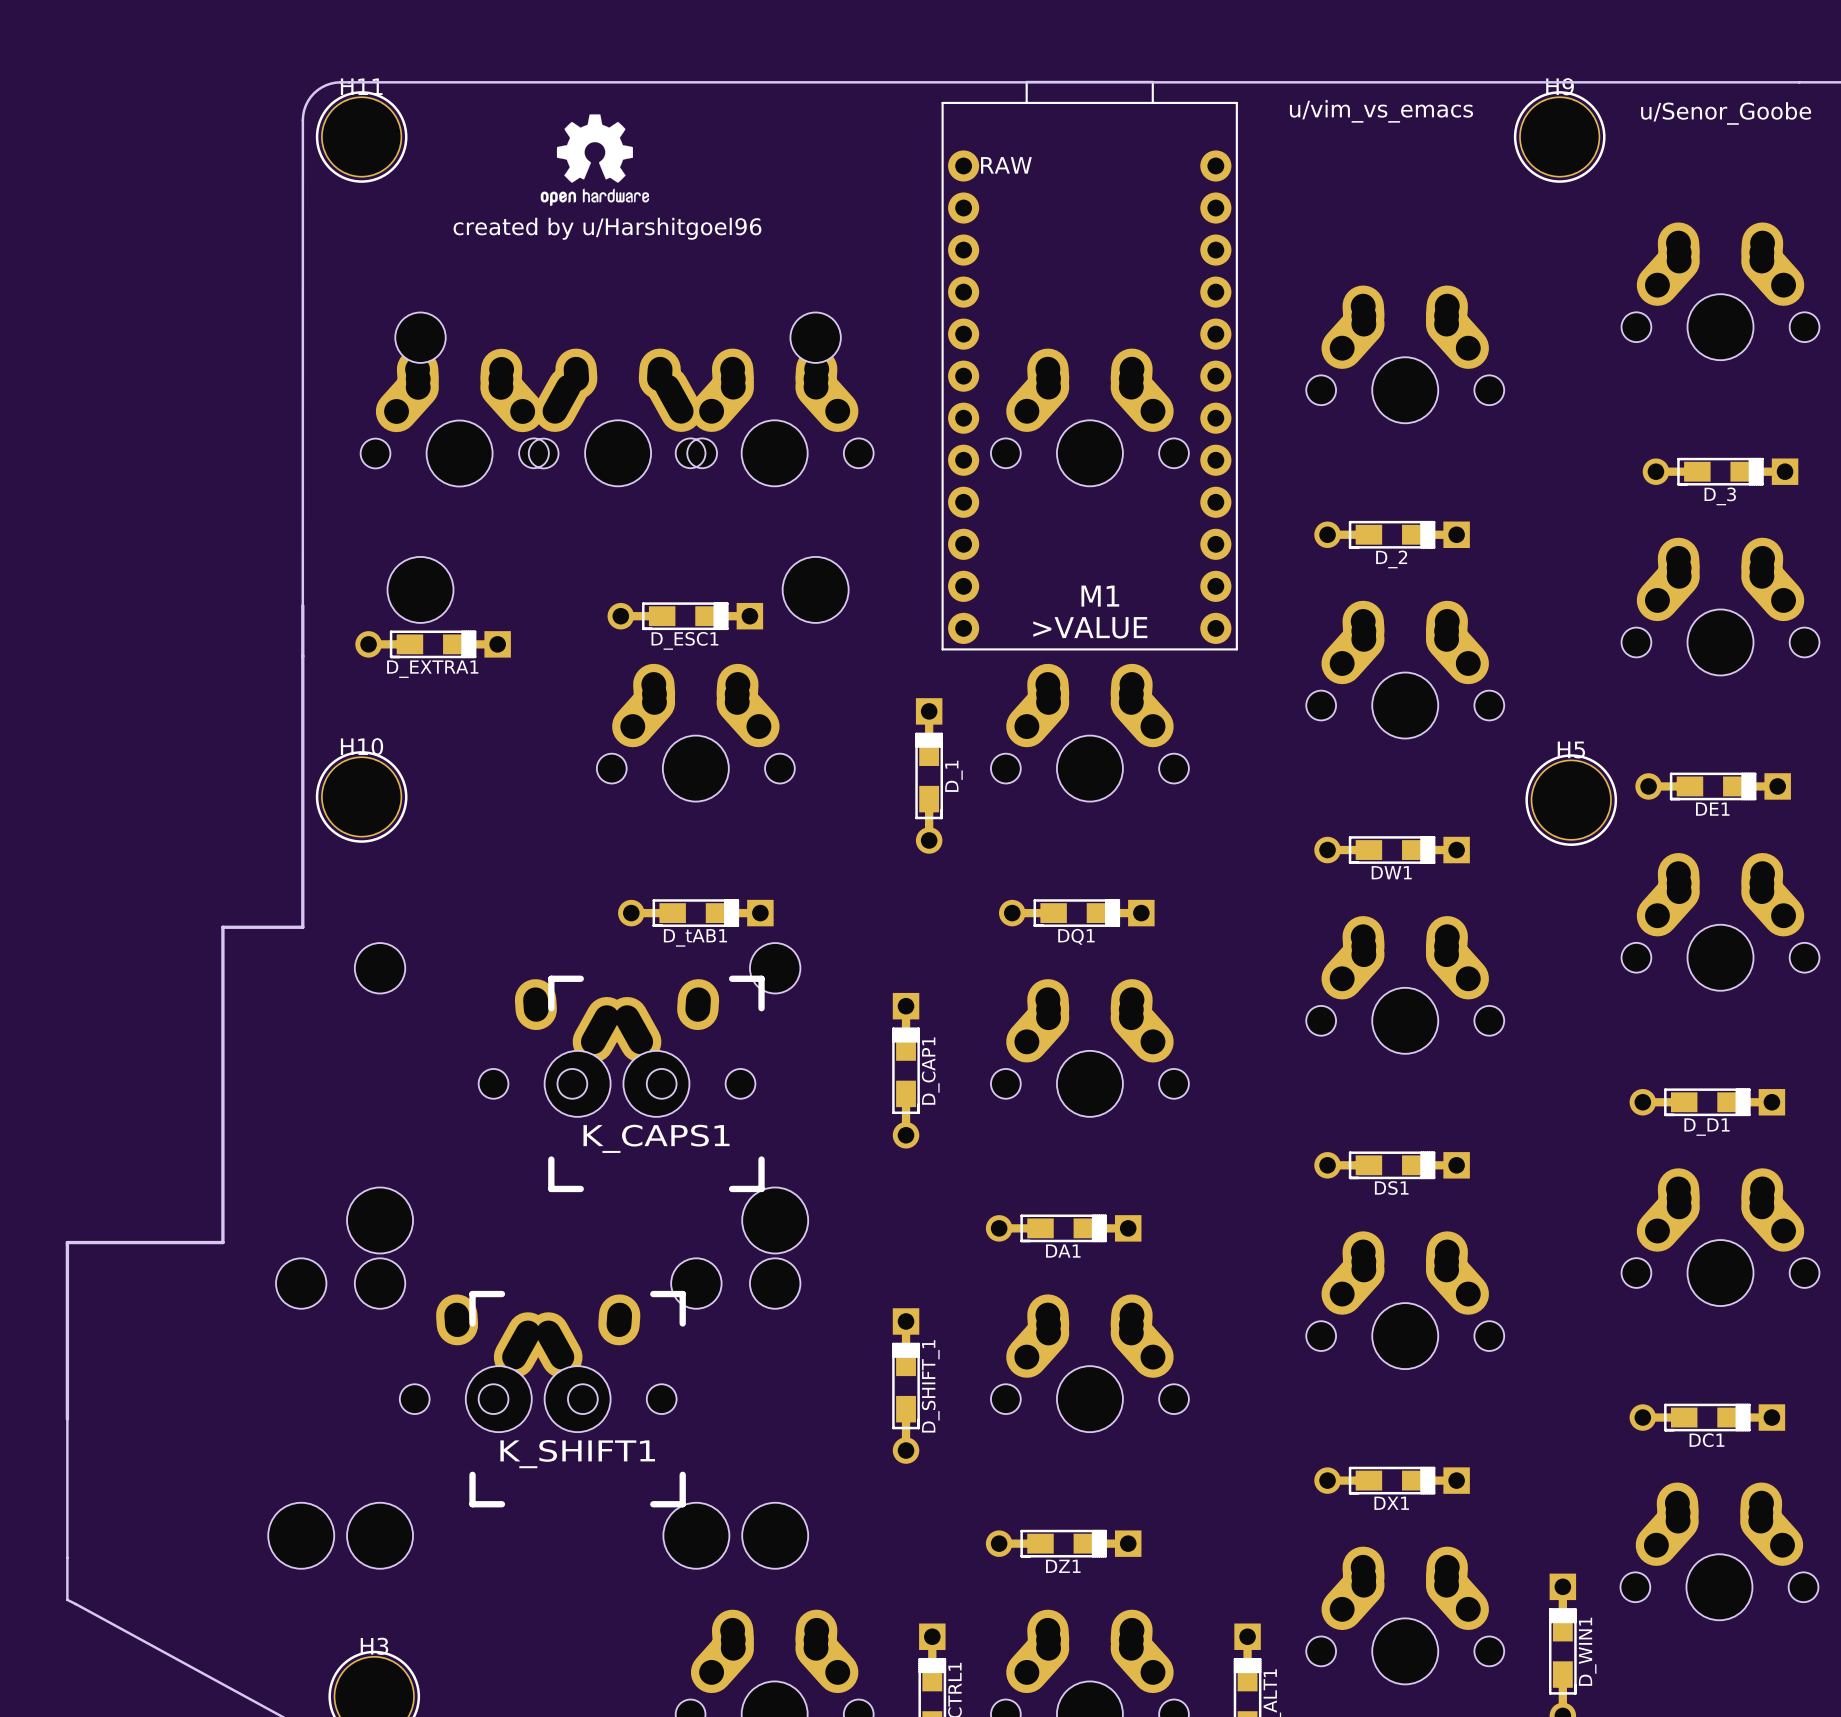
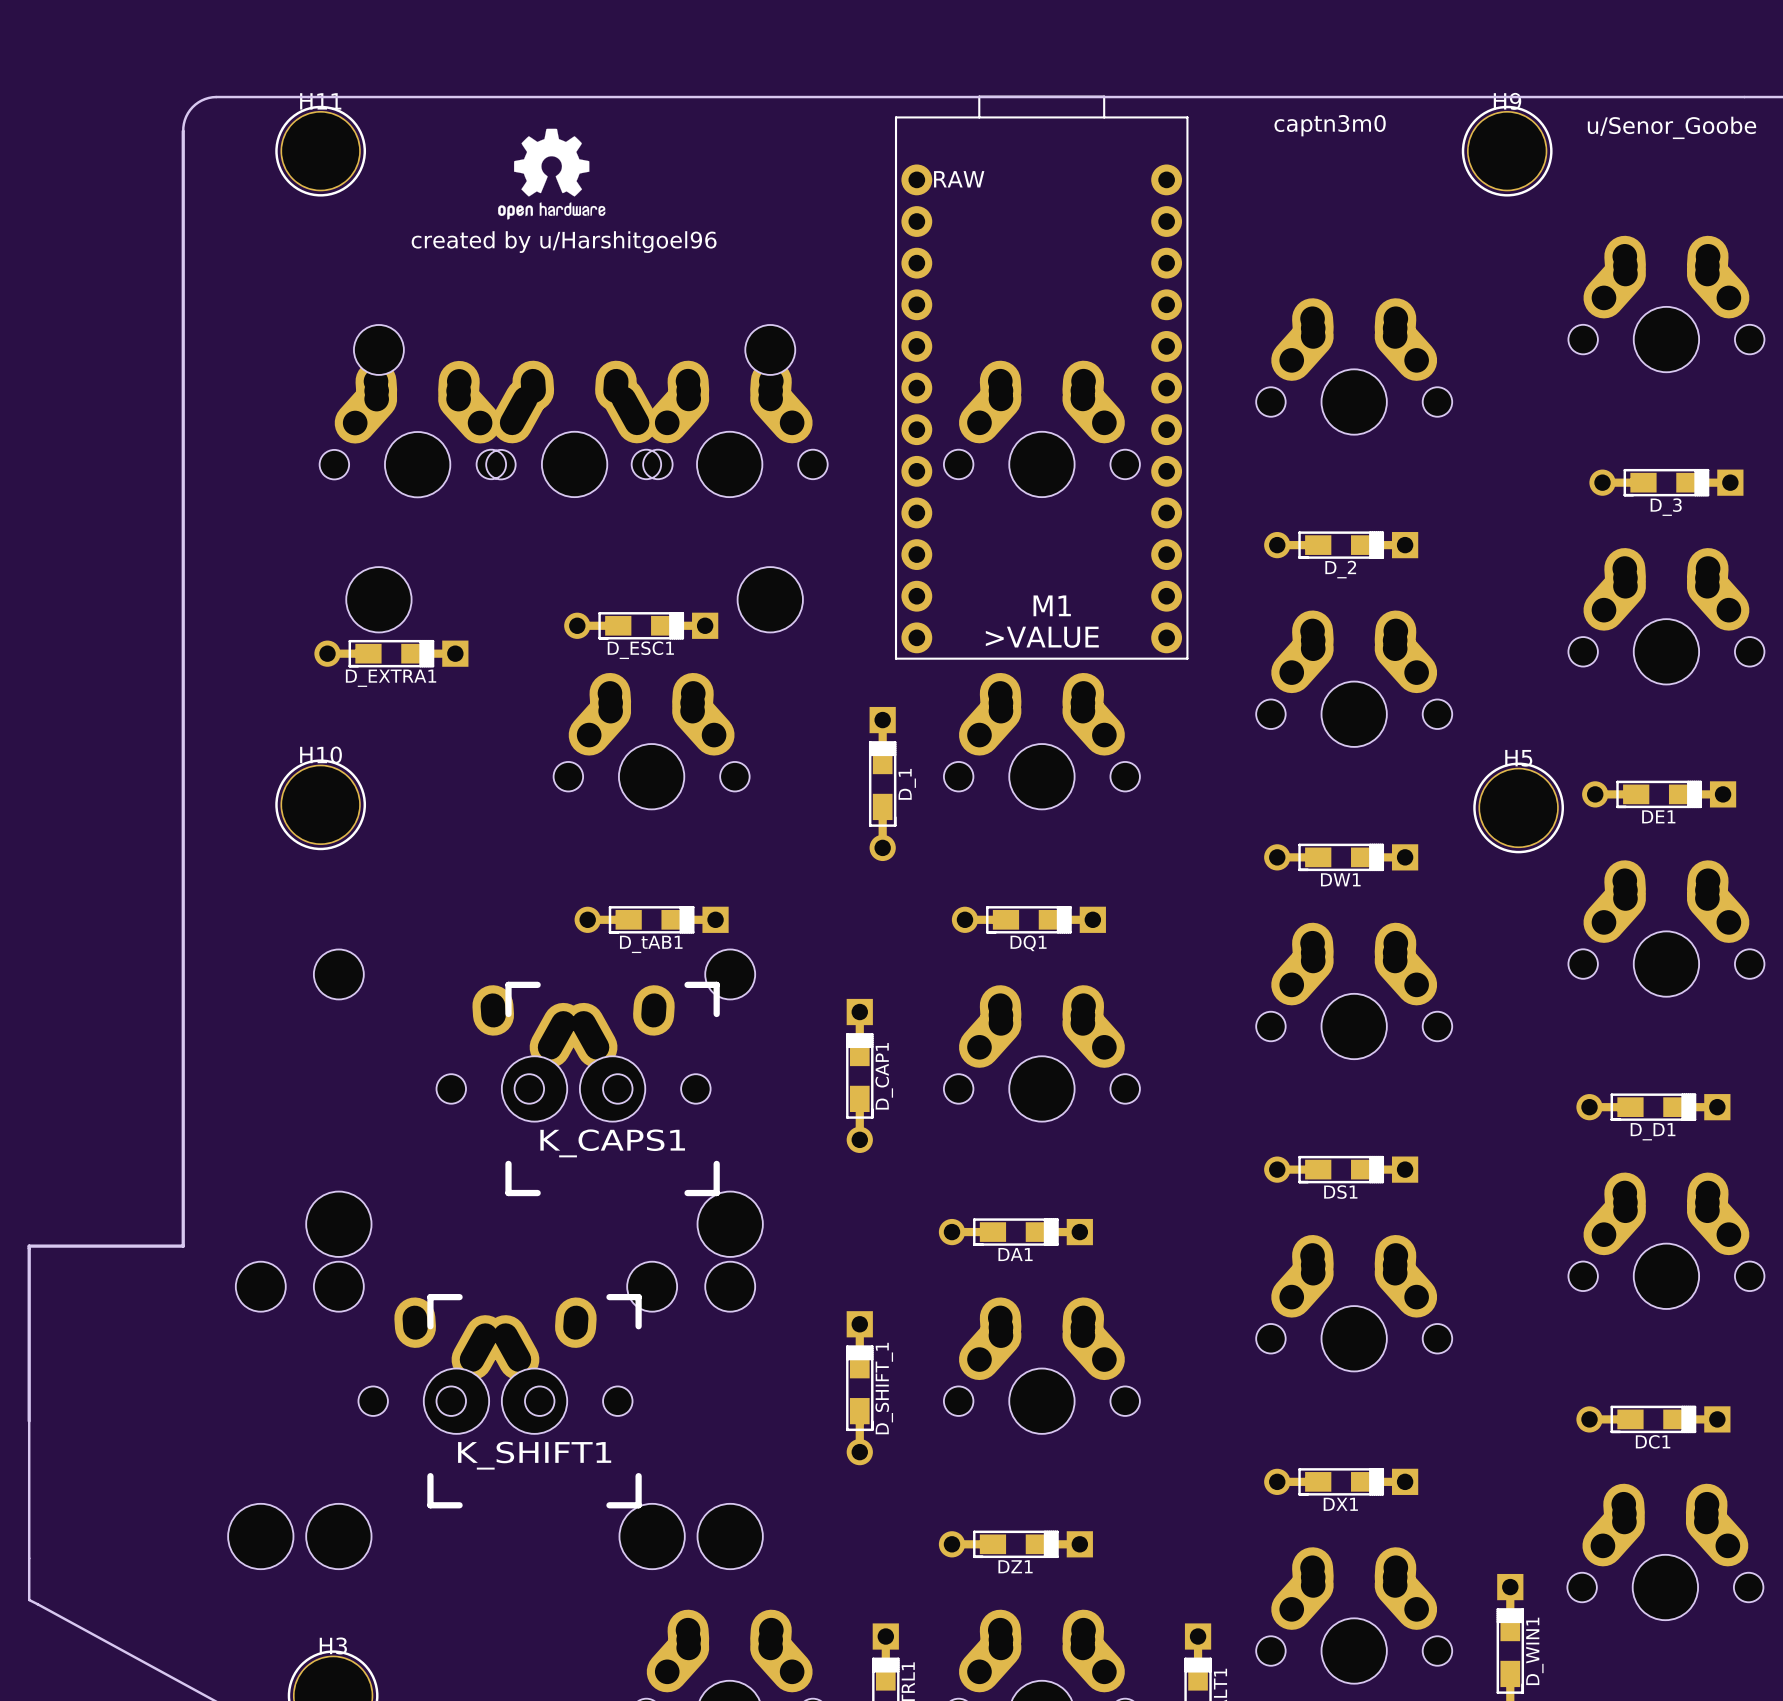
board edge: (340, 82) (326, 85) (313, 93) (305, 105) (302, 120) (302, 927) (222, 927) -> (299, 97) (208, 97) (192, 107) (186, 116) (183, 127) (183, 933)
text: u/vim_vs_emacs (1381, 111) -> captn3m0 (1330, 125)

